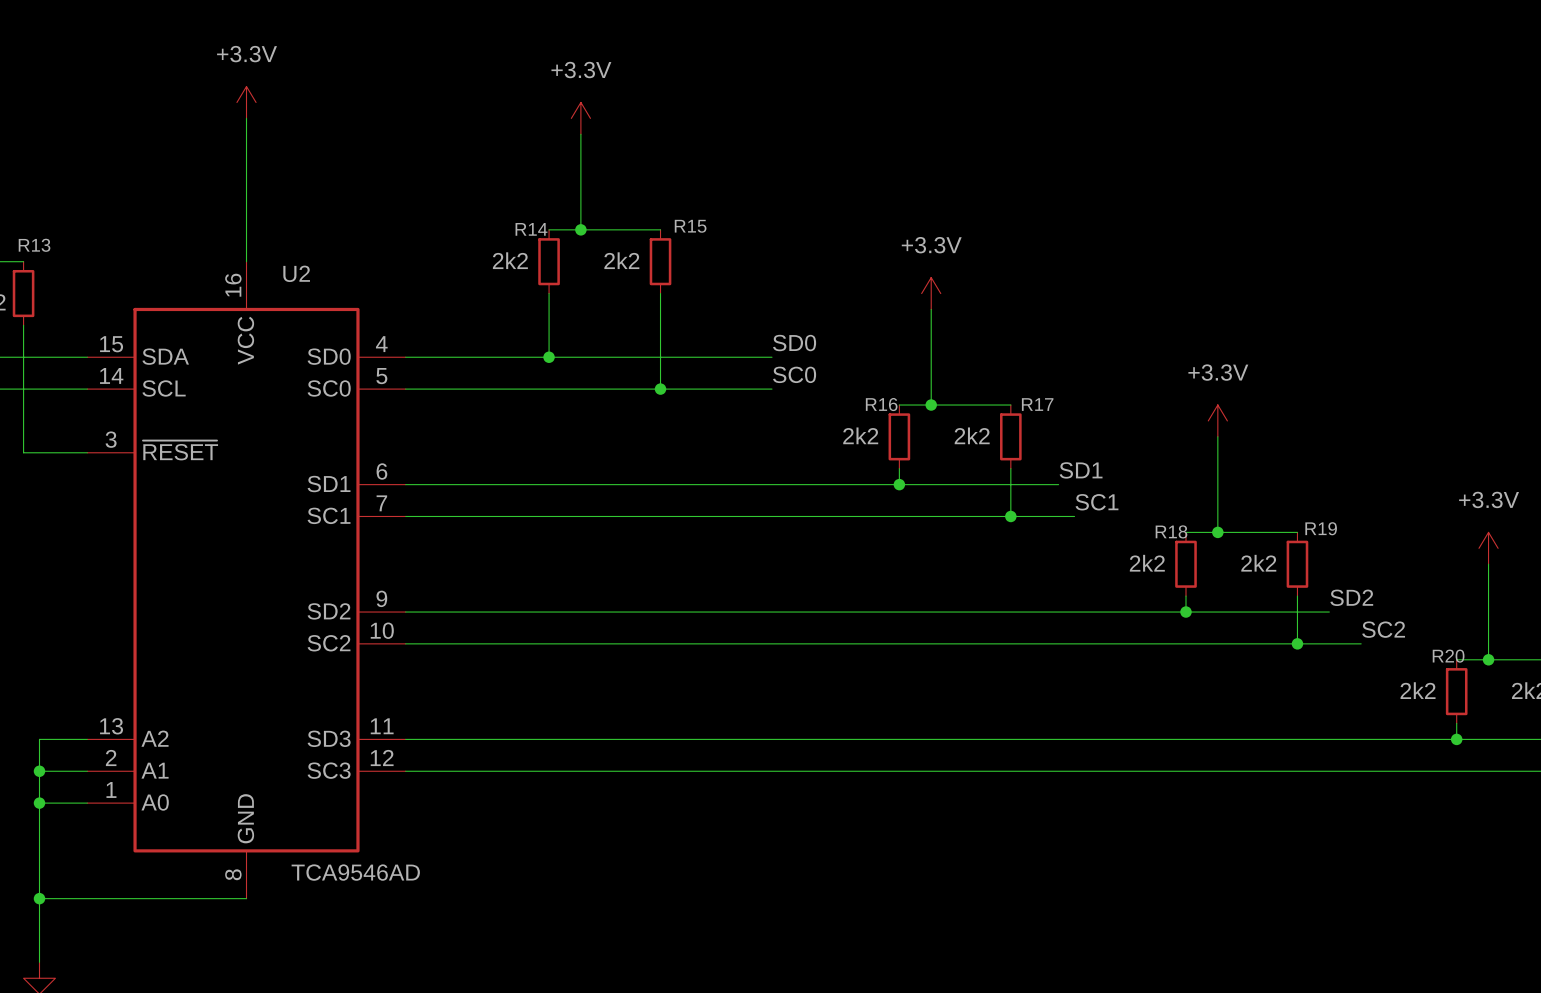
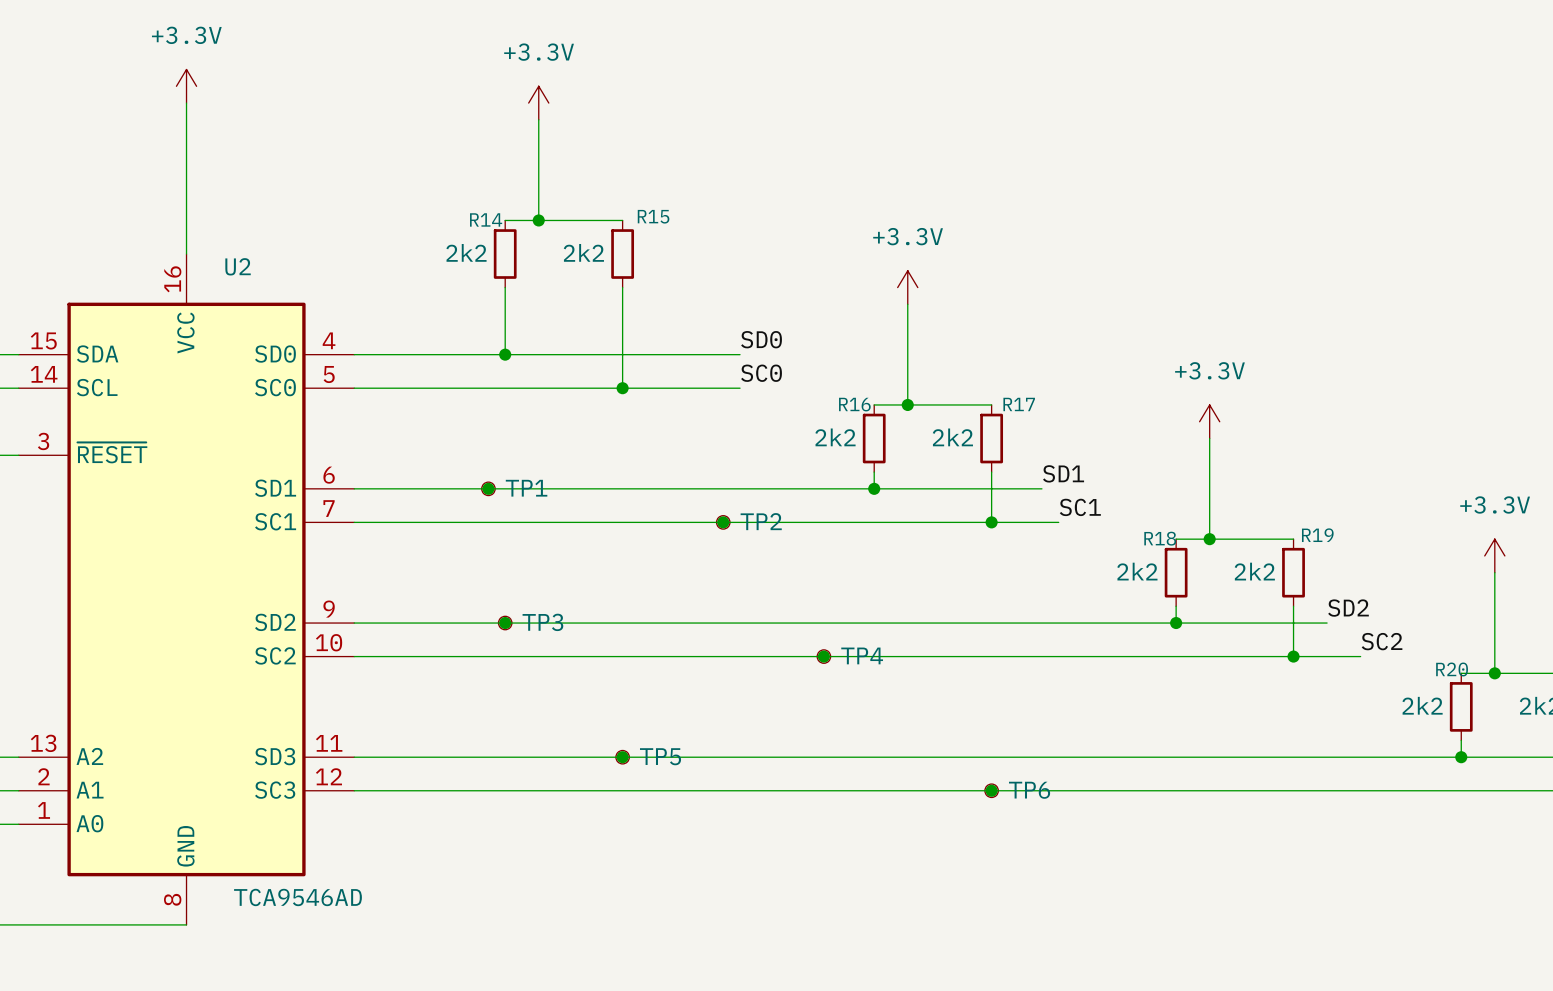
junction: none -> (488, 488)
TP1: none -> (488, 488)
junction: none -> (723, 522)
TP2: none -> (723, 522)
junction: none -> (505, 623)
TP3: none -> (505, 623)
junction: none -> (823, 656)
TP4: none -> (823, 656)
junction: none -> (622, 757)
TP5: none -> (622, 757)
junction: none -> (991, 790)
TP6: none -> (991, 790)

